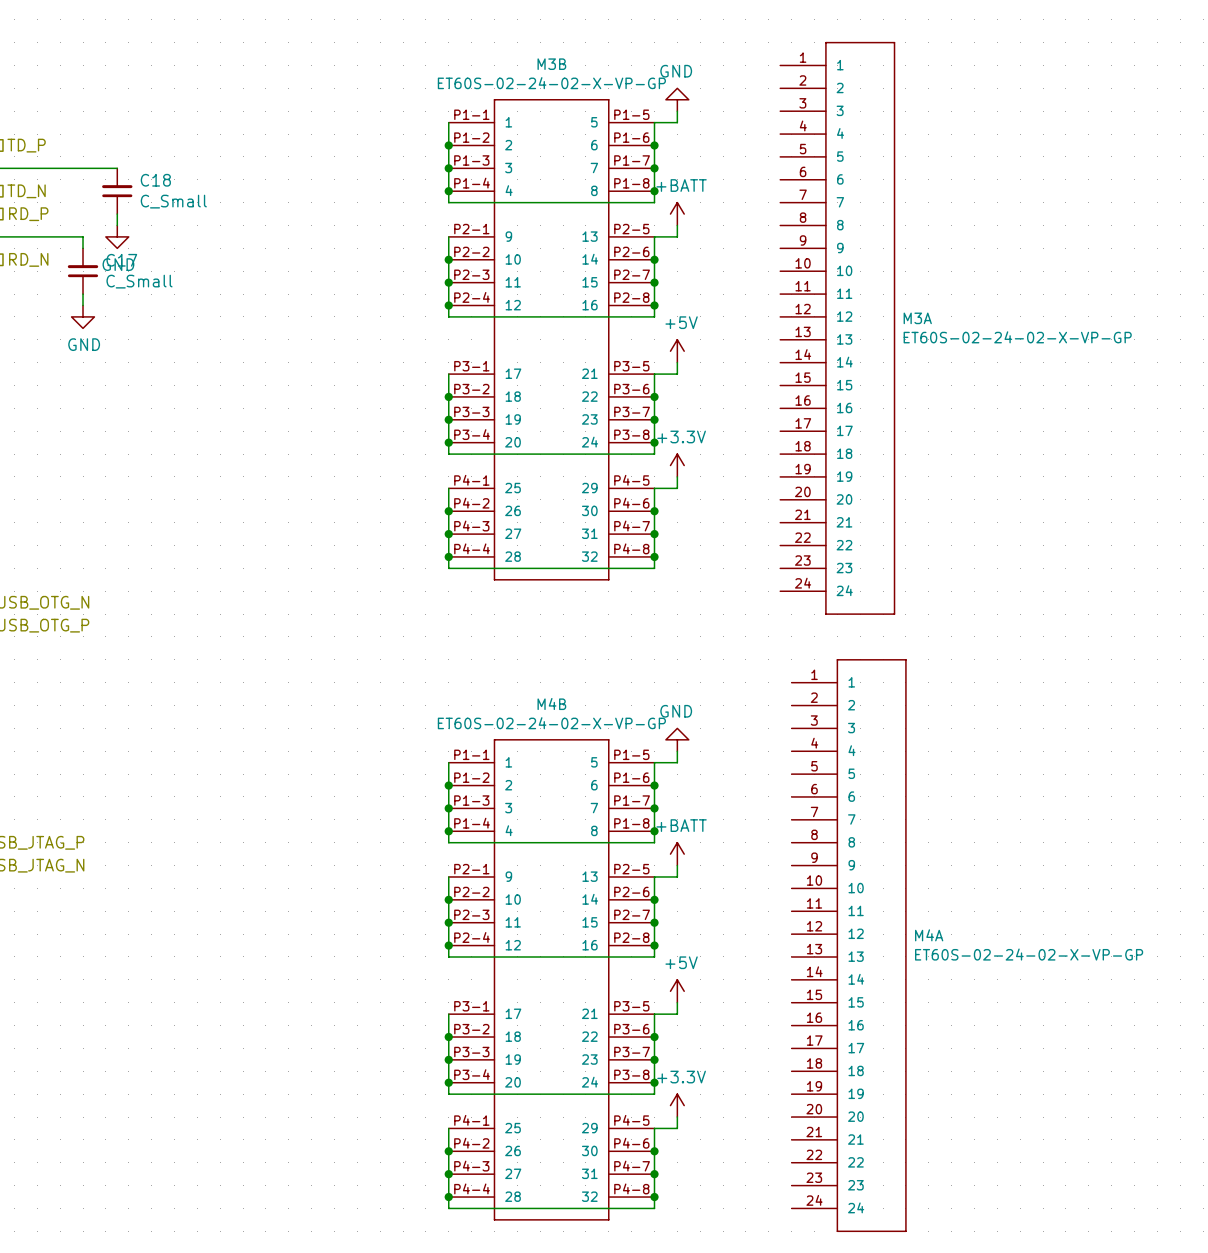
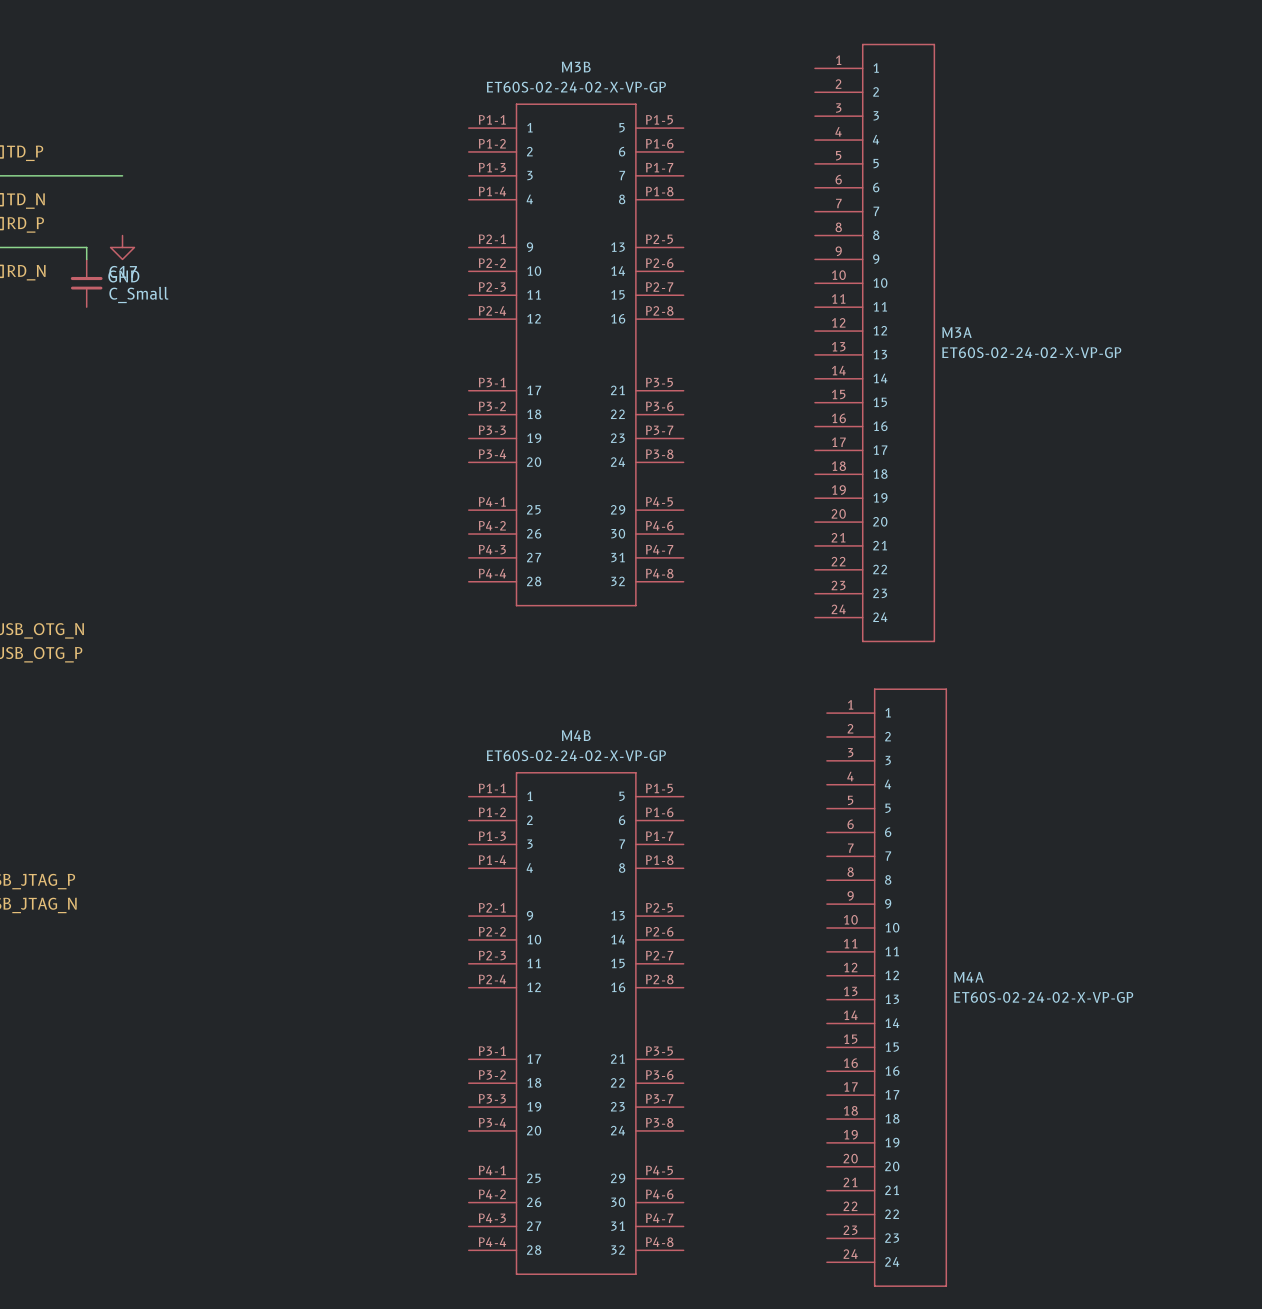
power symbol: GND (677, 99) -> none
wire: (677, 111) (677, 122) (654, 122) (654, 202) (448, 202) (448, 122) -> none
junction: (448, 145) -> none
junction: (654, 145) -> none
junction: (448, 168) -> none
junction: (654, 168) -> none
C18: C_Small (117, 191) -> none
junction: (448, 191) -> none
junction: (654, 191) -> none
wire: (117, 214) (117, 225) -> none
power symbol: +BATT (677, 214) -> none
wire: (677, 225) (677, 236) (654, 236) (654, 316) (448, 316) (448, 236) -> none
junction: (448, 259) -> none
junction: (654, 259) -> none
junction: (448, 282) -> none
junction: (654, 282) -> none
wire: (83, 294) (83, 305) -> none
junction: (448, 305) -> none
junction: (654, 305) -> none
power symbol: GND (83, 316) -> none
power symbol: +5V (677, 351) -> none
wire: (677, 362) (677, 374) (654, 374) (654, 454) (448, 454) (448, 374) -> none
junction: (448, 396) -> none
junction: (654, 396) -> none
junction: (448, 419) -> none
junction: (654, 419) -> none
junction: (448, 442) -> none
junction: (654, 442) -> none
power symbol: +3.3V (677, 465) -> none
wire: (677, 476) (677, 488) (654, 488) (654, 568) (448, 568) (448, 488) -> none
junction: (448, 511) -> none
junction: (654, 511) -> none
junction: (448, 534) -> none
junction: (654, 534) -> none
junction: (448, 556) -> none
junction: (654, 556) -> none
power symbol: GND (677, 739) -> none
wire: (677, 751) (677, 762) (654, 762) (654, 842) (448, 842) (448, 762) -> none
junction: (448, 785) -> none
junction: (654, 785) -> none
junction: (448, 808) -> none
junction: (654, 808) -> none
junction: (448, 831) -> none
junction: (654, 831) -> none
power symbol: +BATT (677, 854) -> none
wire: (677, 865) (677, 876) (654, 876) (654, 956) (448, 956) (448, 876) -> none
junction: (448, 899) -> none
junction: (654, 899) -> none
junction: (448, 922) -> none
junction: (654, 922) -> none
junction: (448, 945) -> none
junction: (654, 945) -> none
power symbol: +5V (677, 991) -> none
wire: (677, 1002) (677, 1014) (654, 1014) (654, 1094) (448, 1094) (448, 1014) -> none
junction: (448, 1037) -> none
junction: (654, 1037) -> none
junction: (448, 1059) -> none
junction: (654, 1059) -> none
junction: (448, 1082) -> none
junction: (654, 1082) -> none
power symbol: +3.3V (677, 1105) -> none
wire: (677, 1117) (677, 1128) (654, 1128) (654, 1208) (448, 1208) (448, 1128) -> none
junction: (448, 1151) -> none
junction: (654, 1151) -> none
junction: (448, 1174) -> none
junction: (654, 1174) -> none
junction: (448, 1197) -> none
junction: (654, 1197) -> none

